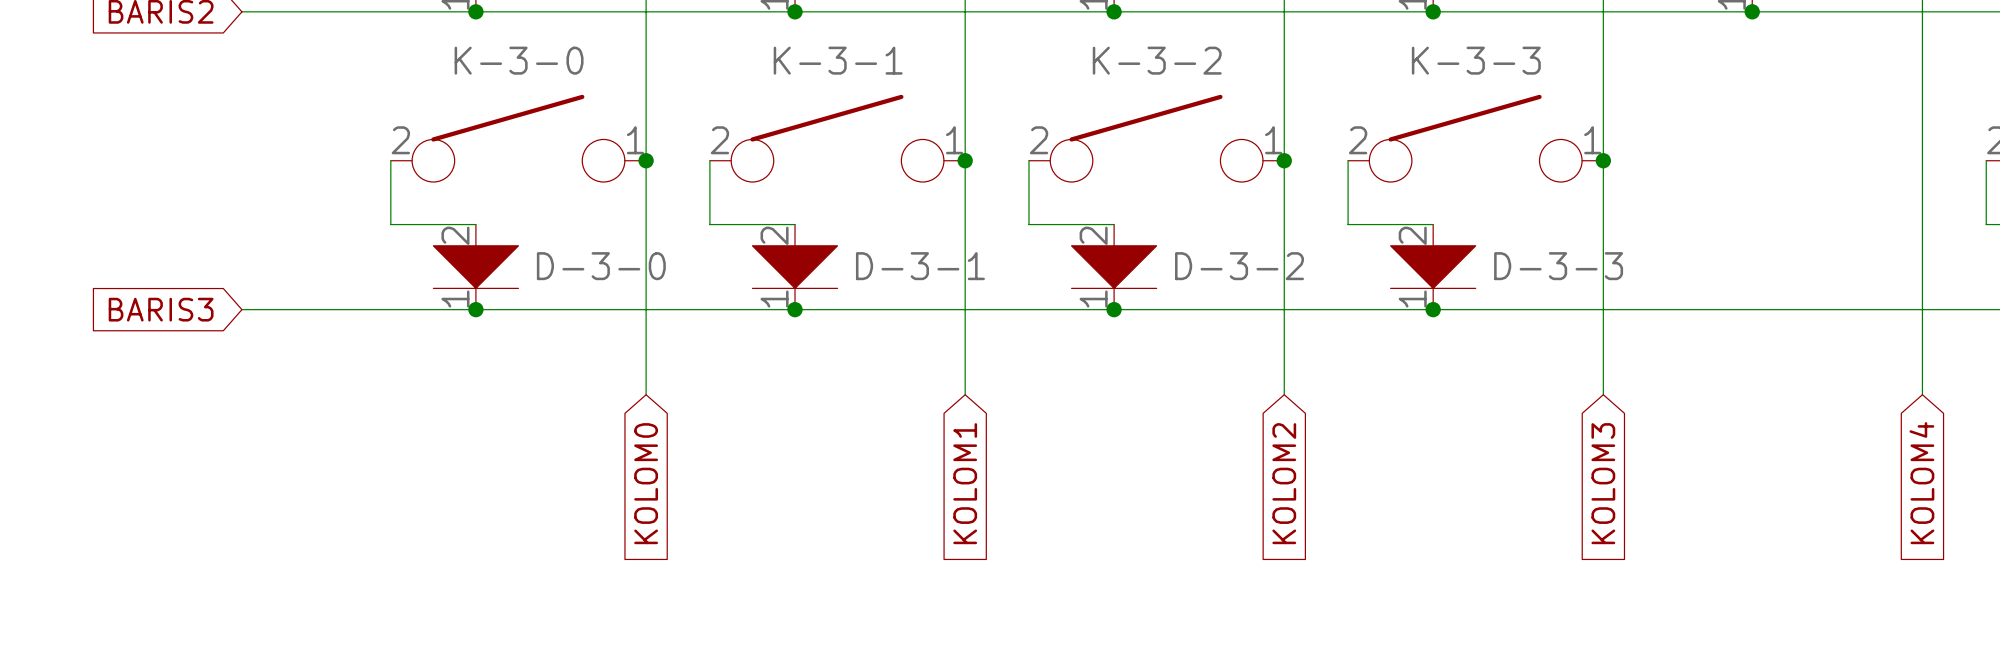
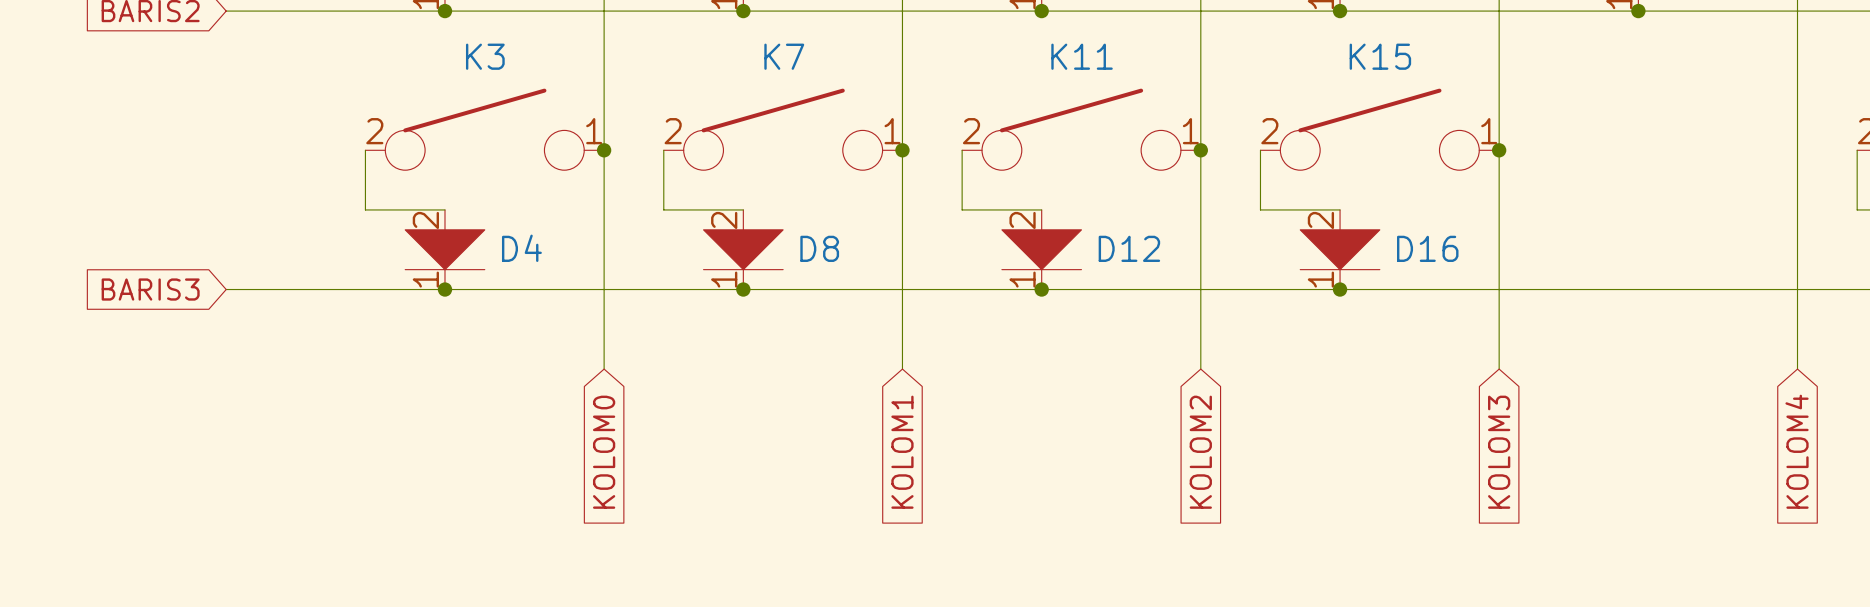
K-3-0 name: K-3-0 (519, 60) -> K3 (485, 56)
K-3-1 name: K-3-1 (838, 60) -> K7 (784, 56)
K-3-2 name: K-3-2 (1157, 60) -> K11 (1082, 56)
K-3-3 name: K-3-3 (1476, 60) -> K15 (1380, 56)
D-3-0 name: D-3-0 (601, 266) -> D4 (521, 248)
D-3-1 name: D-3-1 (920, 266) -> D8 (819, 248)
D-3-2 name: D-3-2 (1239, 266) -> D12 (1129, 248)
D-3-3 name: D-3-3 (1558, 266) -> D16 (1427, 248)

